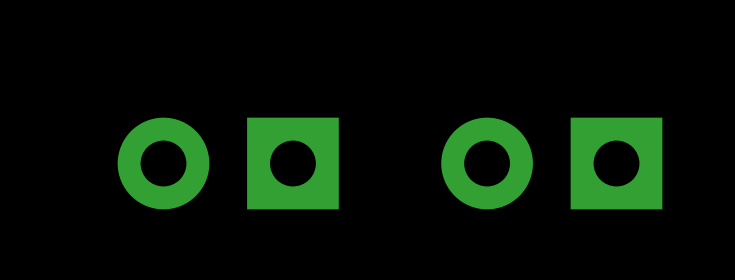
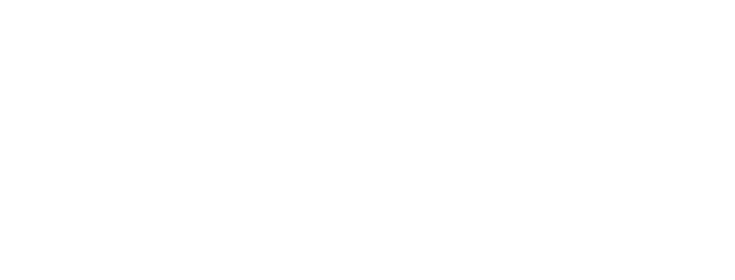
part: (228, 163) -> none
part: (551, 163) -> none

